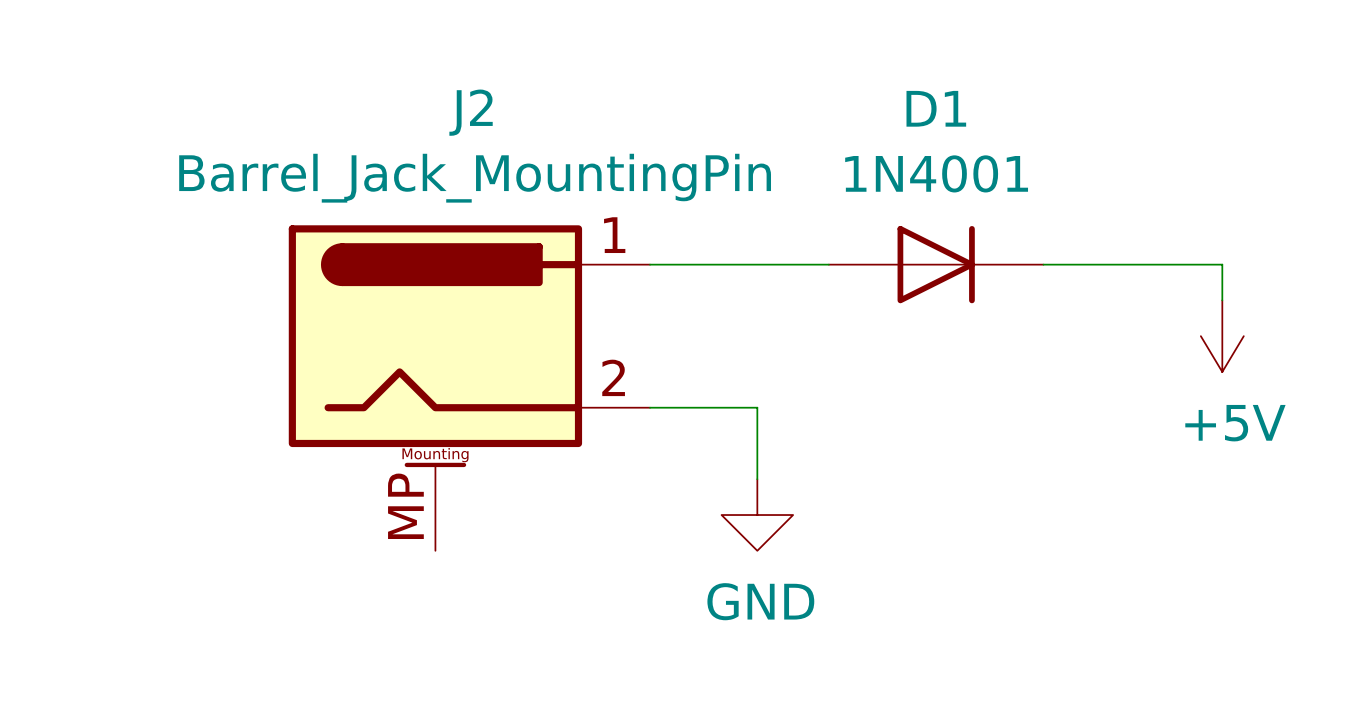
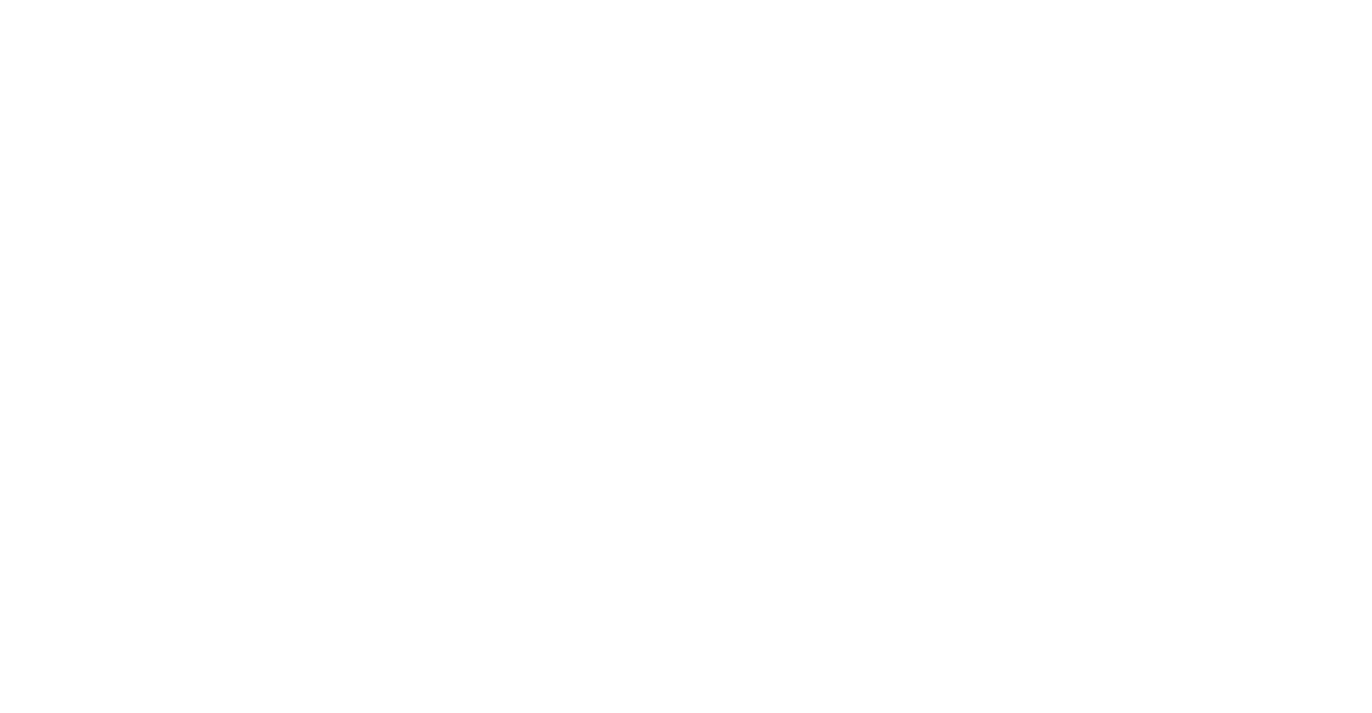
wire: (650, 264) (828, 264) -> none
D1: 1N4001 (936, 264) -> none
wire: (1043, 264) (1222, 264) (1222, 300) -> none
power symbol: +5V (1222, 336) -> none
J2: Barrel_Jack_MountingPin (469, 388) -> none
wire: (650, 407) (757, 407) (757, 479) -> none
power symbol: GND (757, 515) -> none

